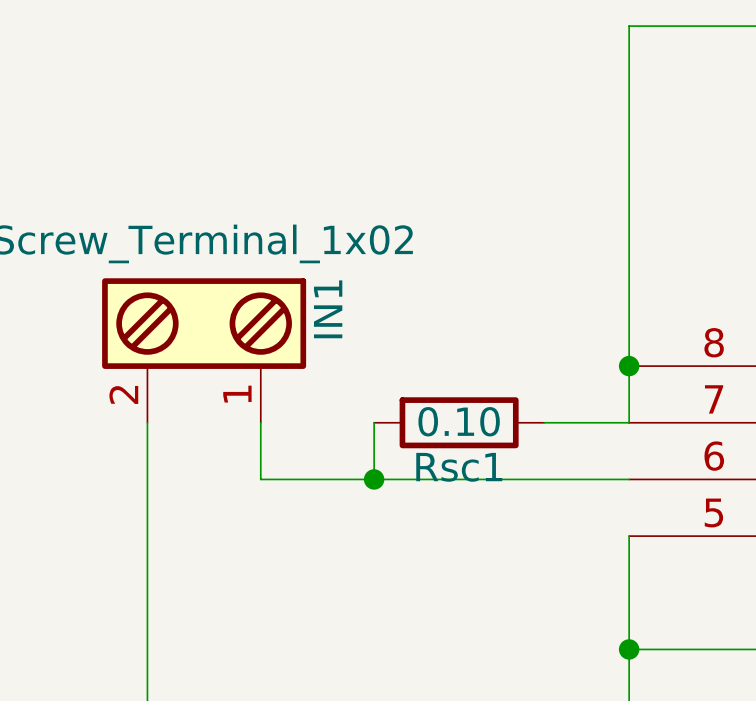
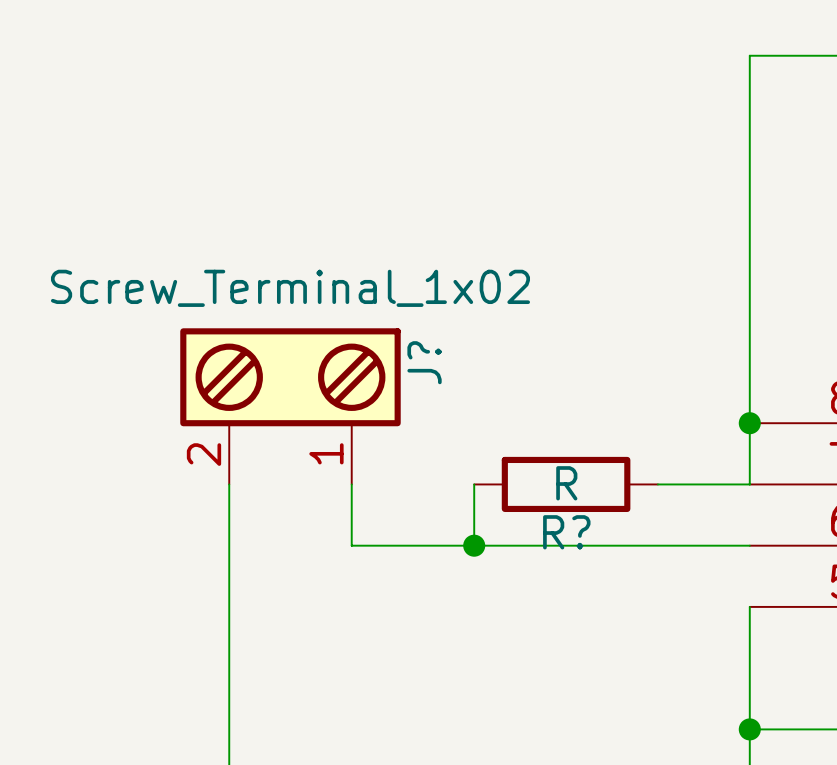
IN1 name: IN1 (328, 309) -> J? (424, 362)
Rsc1 value: 0.10 (459, 421) -> R (566, 483)
Rsc1 name: Rsc1 (459, 467) -> R? (566, 532)

